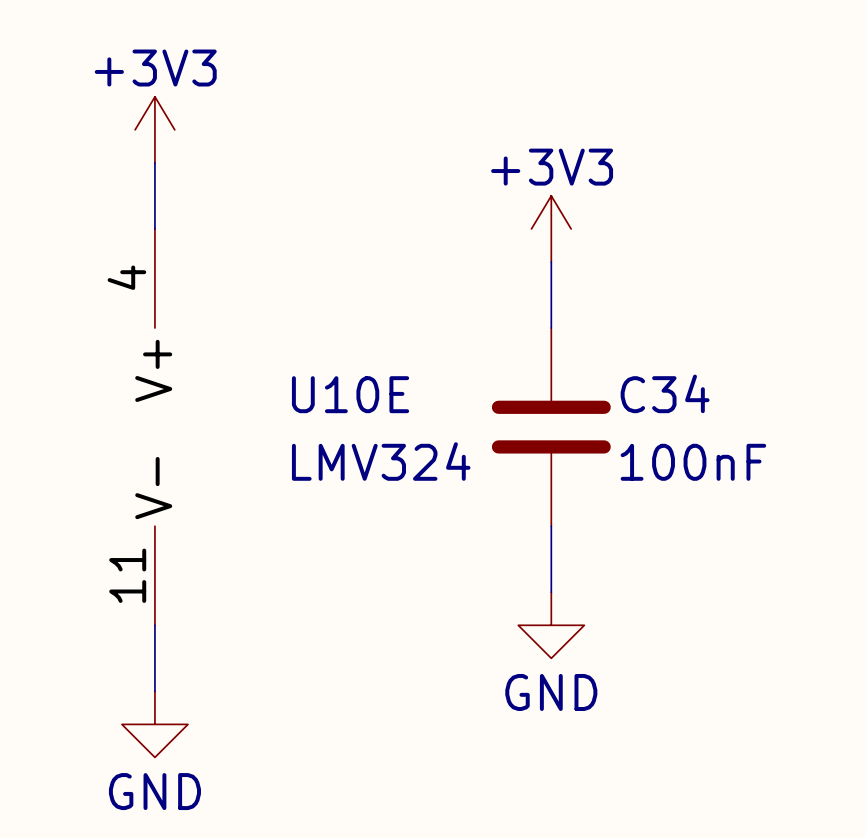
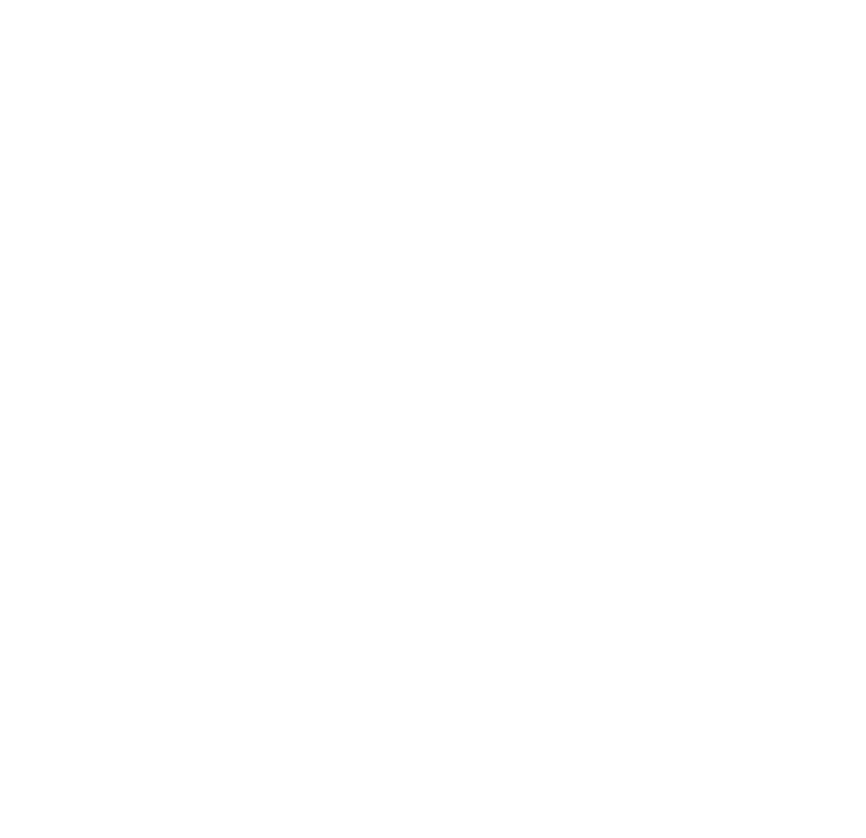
power symbol: +3V3 (154, 129) -> none
wire: (154, 162) (154, 228) -> none
power symbol: +3V3 (551, 228) -> none
wire: (551, 261) (551, 328) -> none
U10E: LMV324 (154, 427) -> none
C34: 100nF (551, 427) -> none
wire: (551, 526) (551, 592) -> none
wire: (154, 625) (154, 691) -> none
power symbol: GND (551, 625) -> none
power symbol: GND (154, 724) -> none

